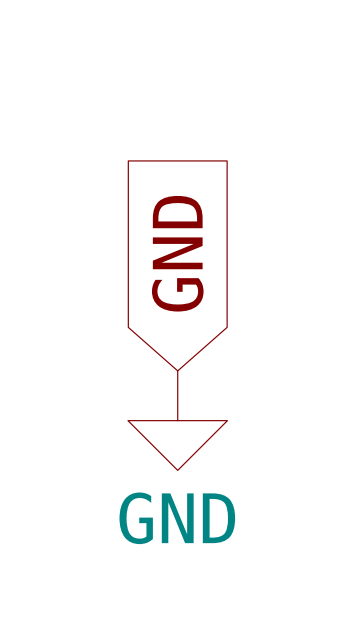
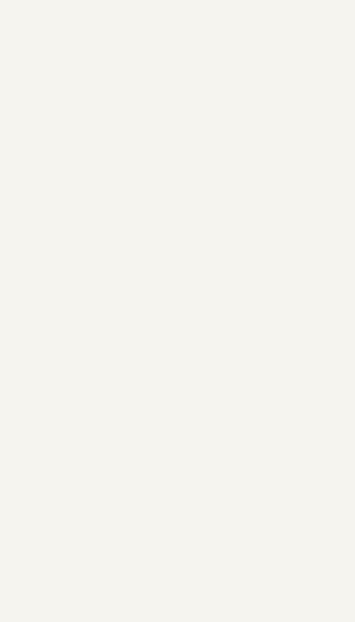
global label: GND (177, 253) -> none
power symbol: GND (177, 420) -> none

